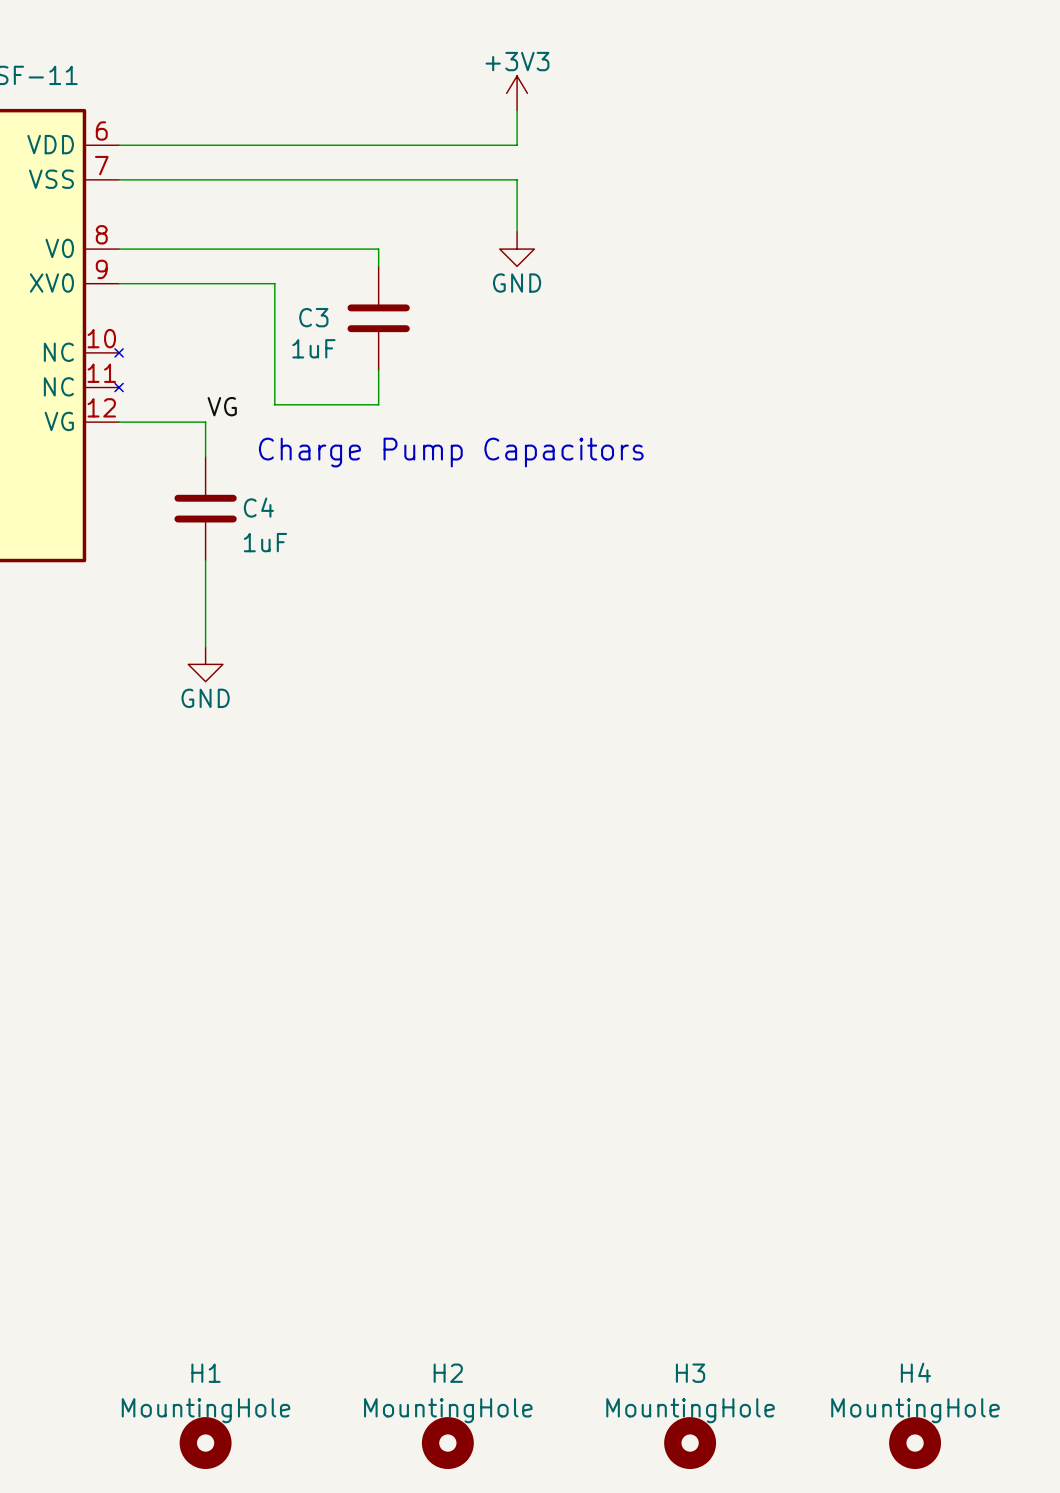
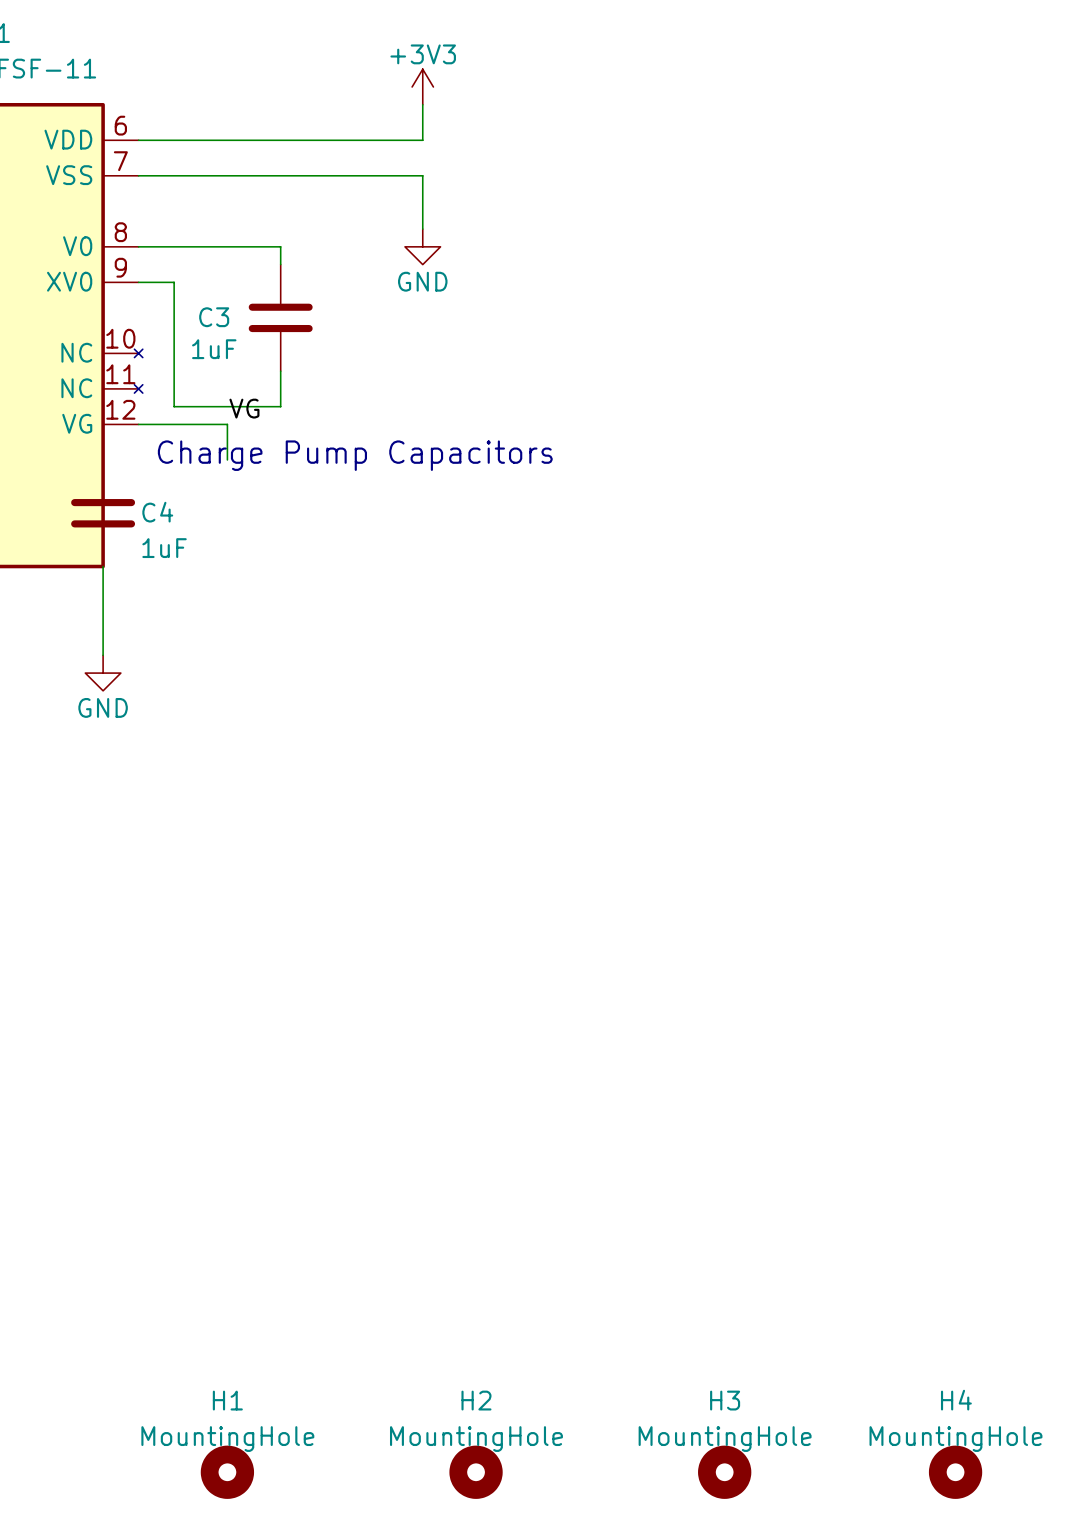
power symbol position: +3V3 (517, 93) -> +3V3 (422, 87)
wire: (517, 110) (517, 145) (395, 145) -> (422, 104) (422, 140)
wire: (395, 179) (517, 179) (517, 231) -> (422, 175) (422, 229)
wire: (257, 249) (378, 249) (378, 266) -> (280, 246) (280, 264)
power symbol position: GND (517, 249) -> GND (422, 246)
wire: (153, 283) (274, 283) (274, 404) (378, 404) (378, 370) -> (174, 282) (174, 406) (280, 406) (280, 371)
C3 position: (378, 318) -> (280, 317)
text position: Charge Pump Capacitors (451, 452) -> Charge Pump Capacitors (355, 455)
C4 position: (205, 508) -> (103, 513)
wire: (205, 560) (205, 647) -> (103, 566) (103, 655)
power symbol position: GND (205, 664) -> GND (103, 673)

